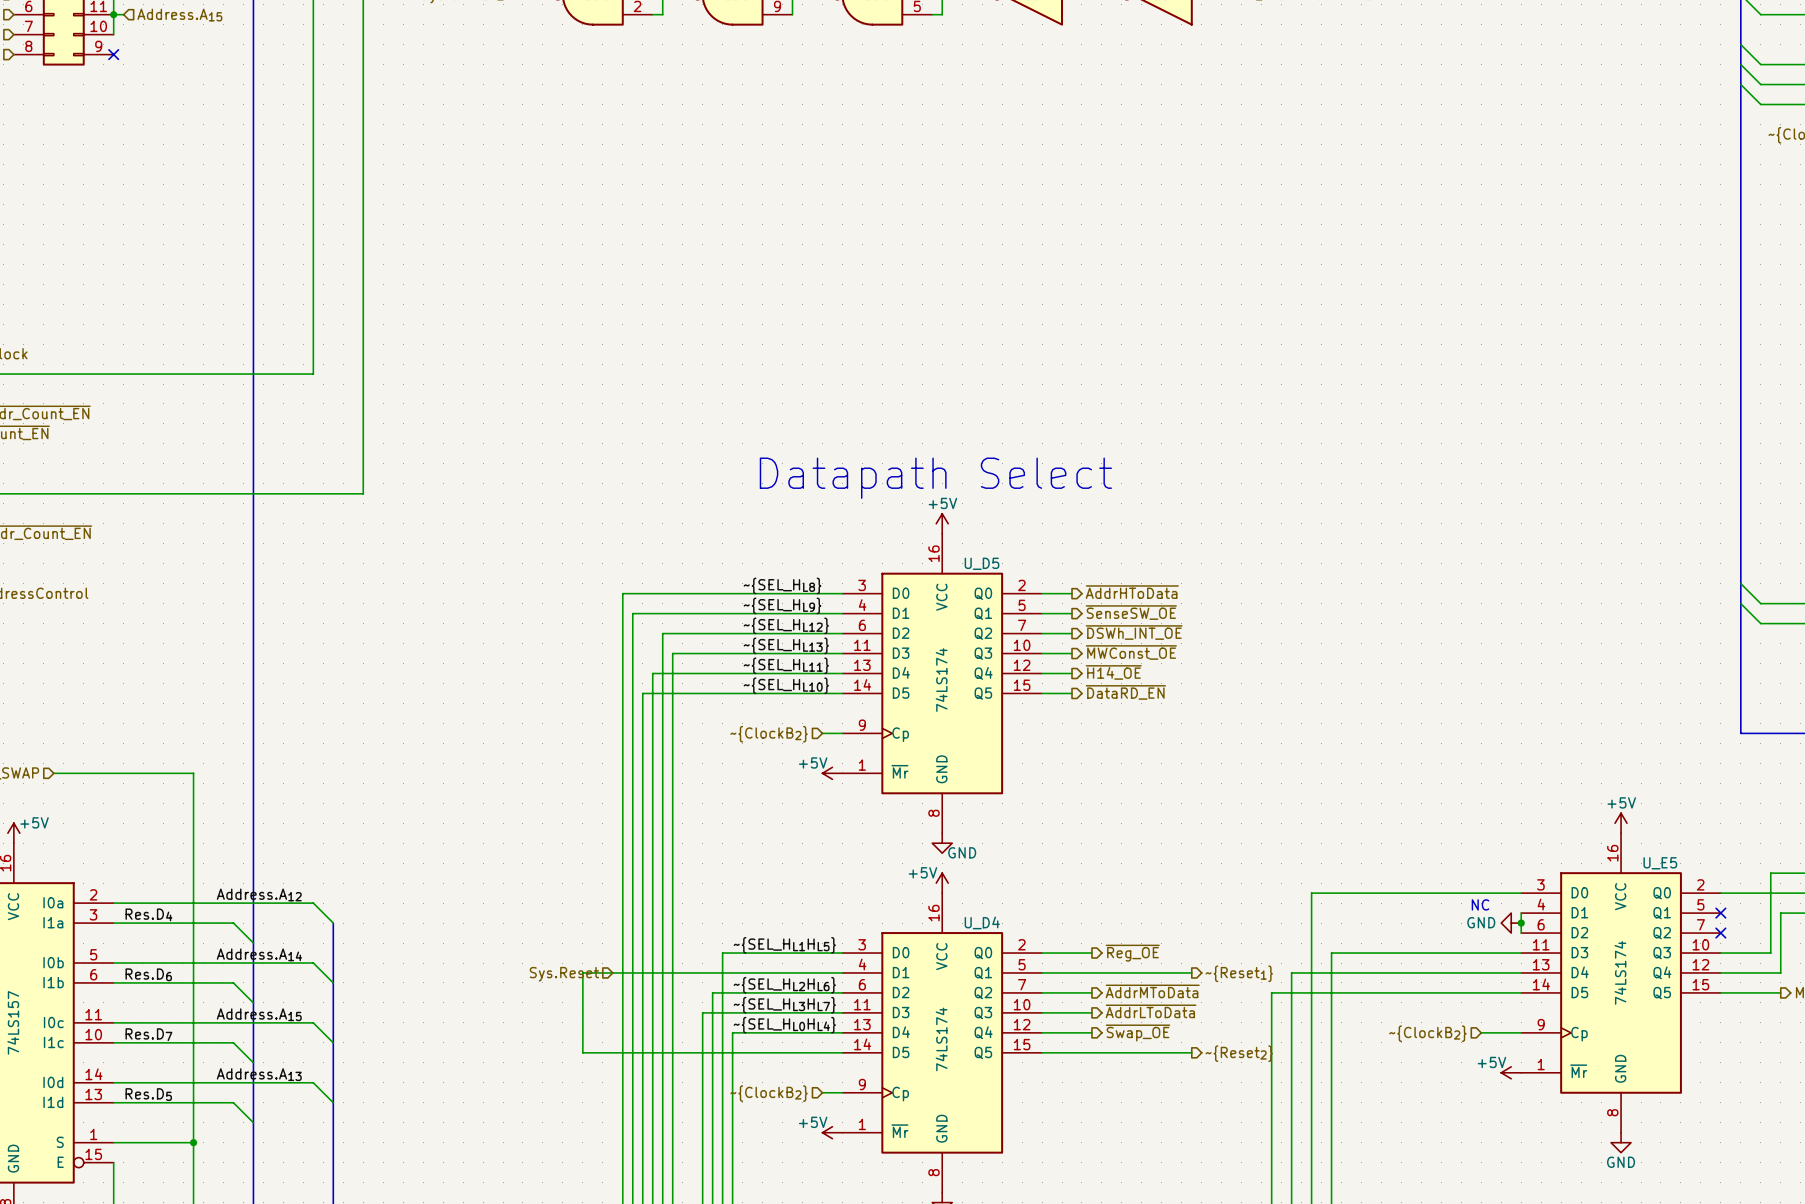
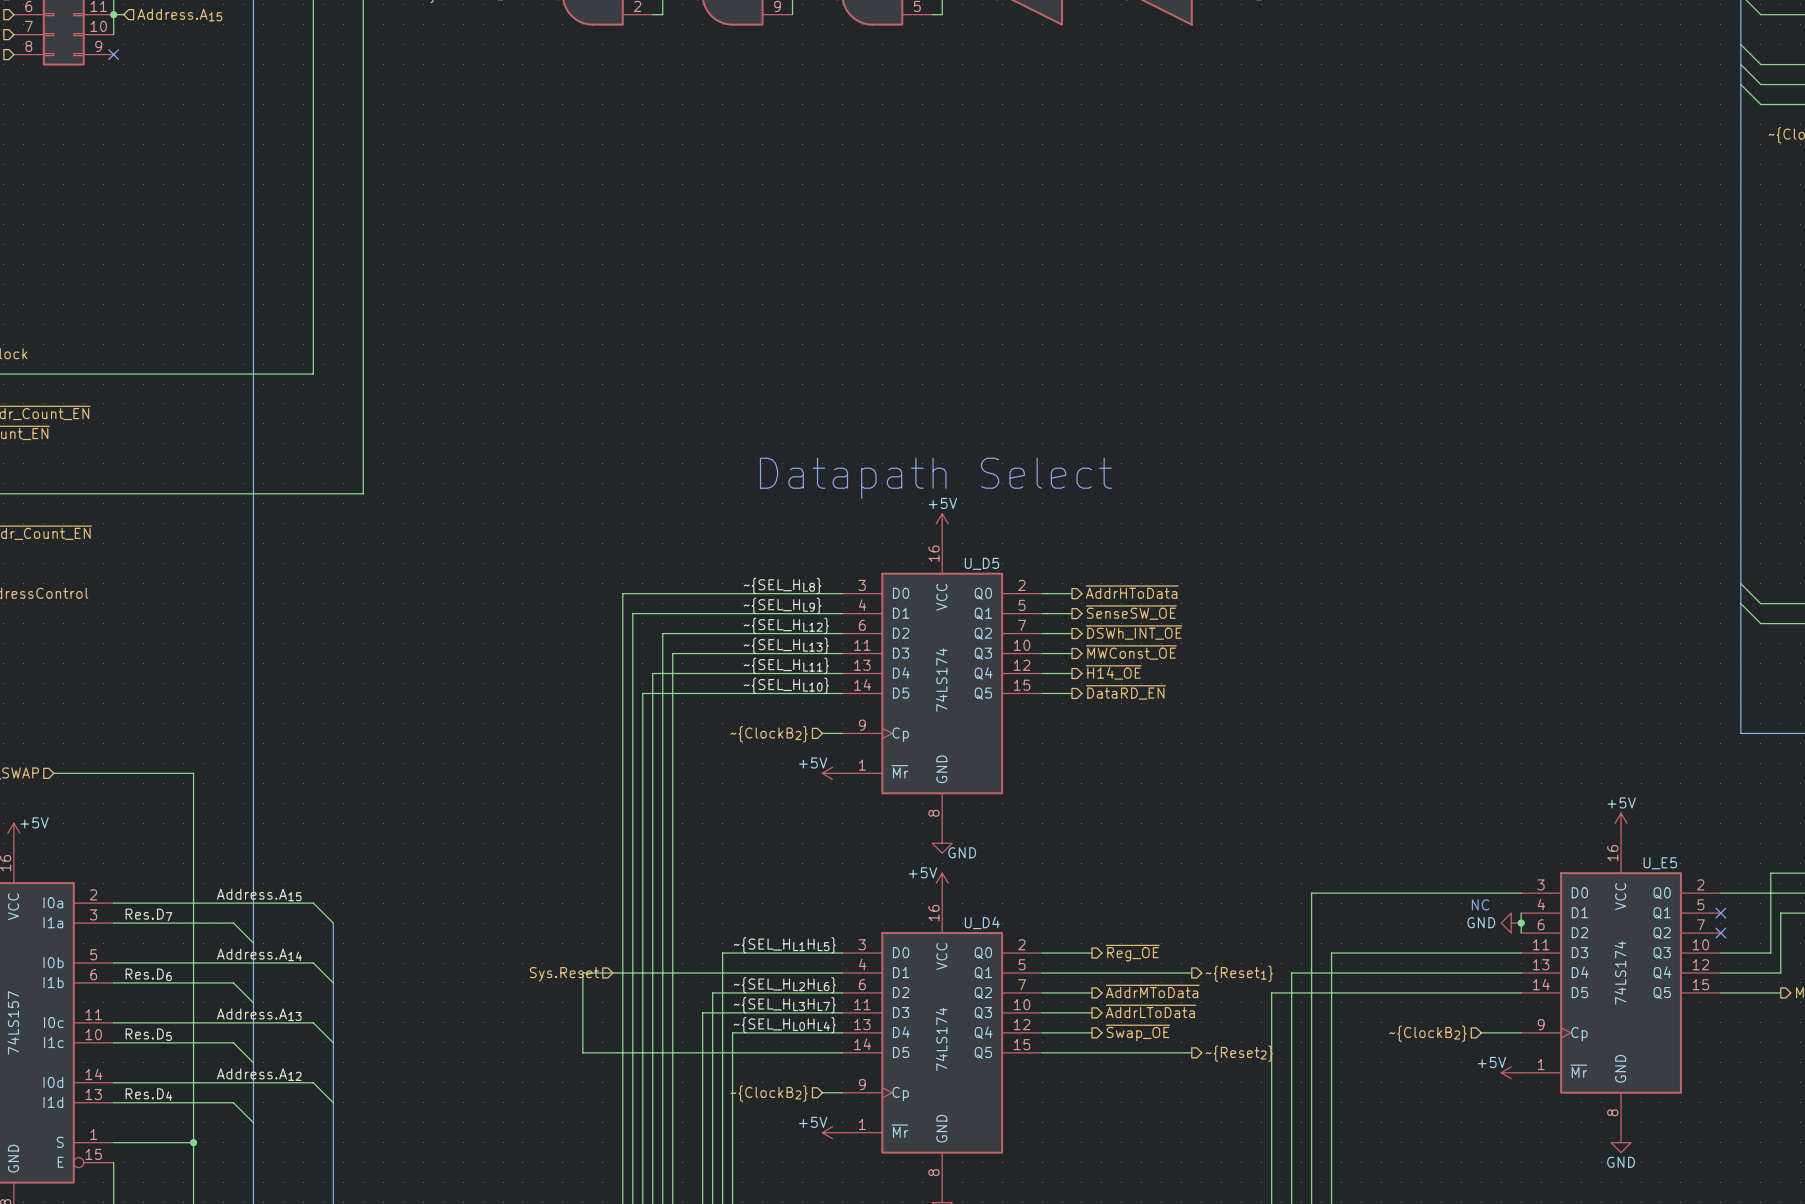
label: Address.A12 (259, 894) -> Address.A15 (259, 894)
label: Res.D4 (148, 914) -> Res.D7 (148, 914)
label: Address.A15 (259, 1014) -> Address.A13 (259, 1014)
label: Res.D7 (148, 1034) -> Res.D5 (148, 1034)
label: Address.A13 (259, 1074) -> Address.A12 (259, 1074)
label: Res.D5 (148, 1094) -> Res.D4 (148, 1094)

